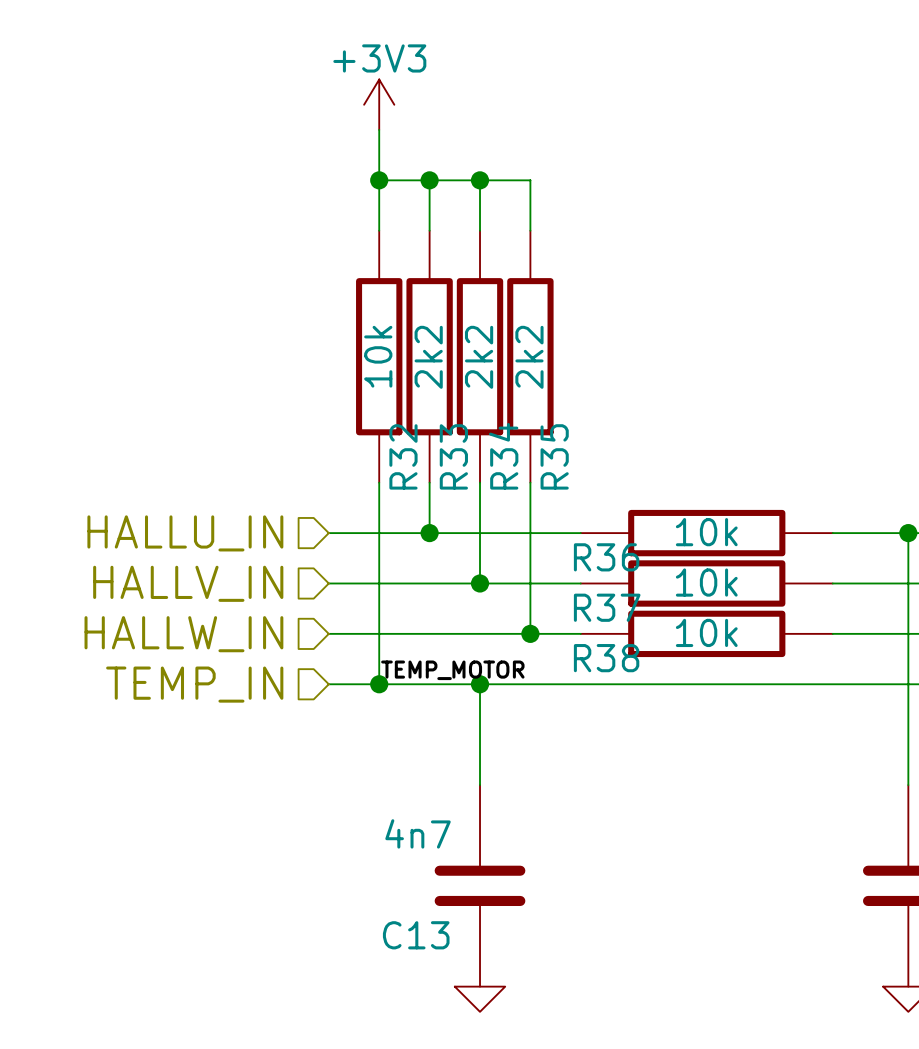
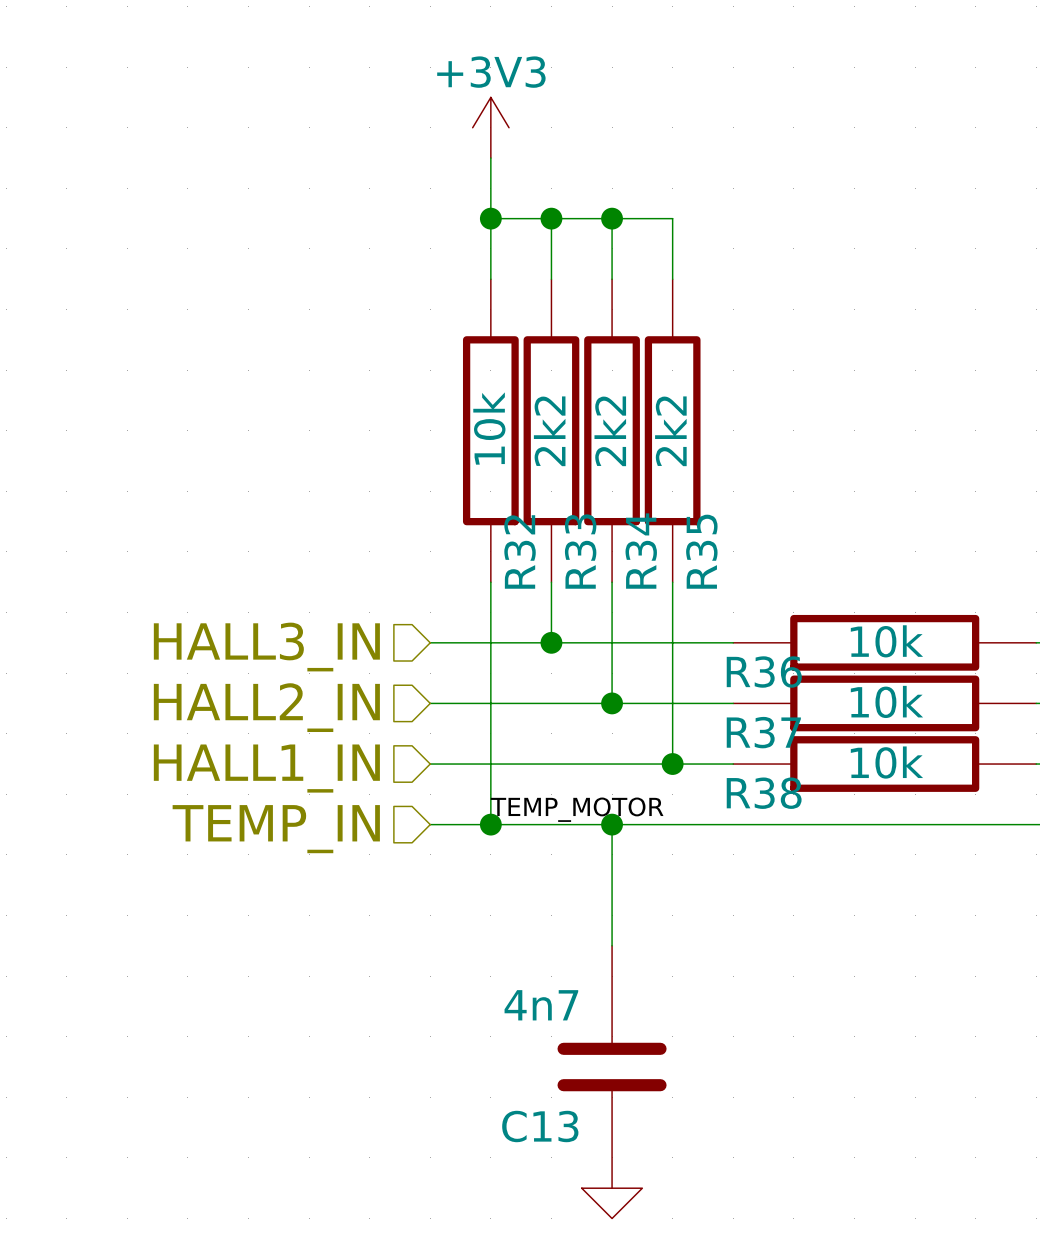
hierarchical label: HALLU_IN (185, 533) -> HALL3_IN (266, 647)
hierarchical label: HALLV_IN (188, 583) -> HALL2_IN (266, 707)
hierarchical label: HALLW_IN (183, 634) -> HALL1_IN (266, 768)

